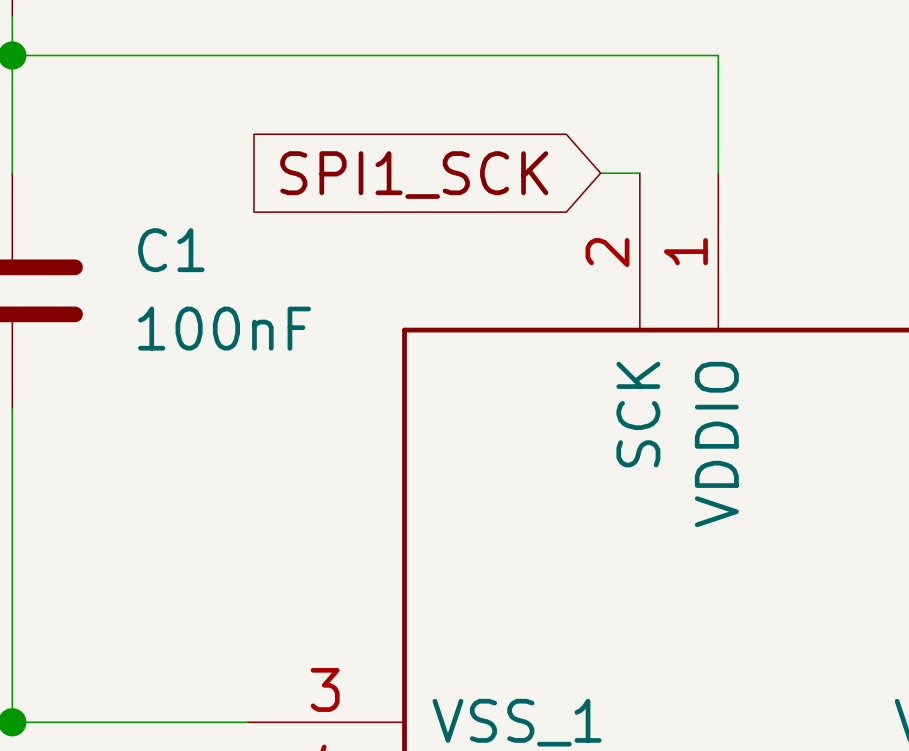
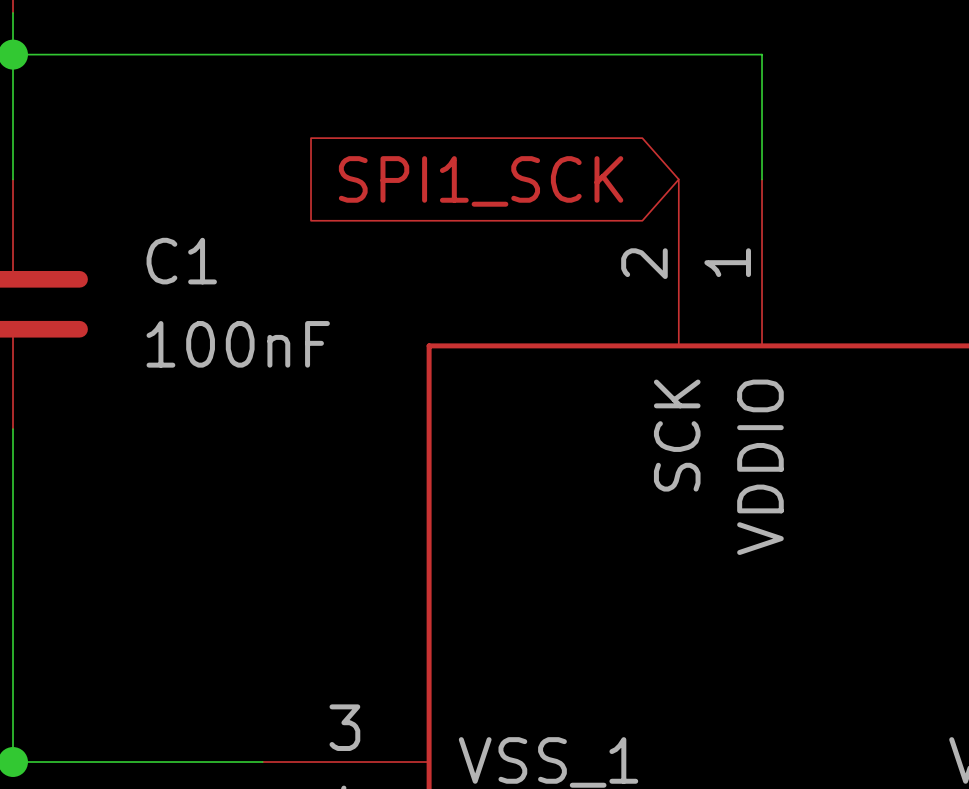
wire: (600, 173) (639, 173) -> none
global label position: SPI1_SCK (414, 175) -> SPI1_SCK (481, 181)

